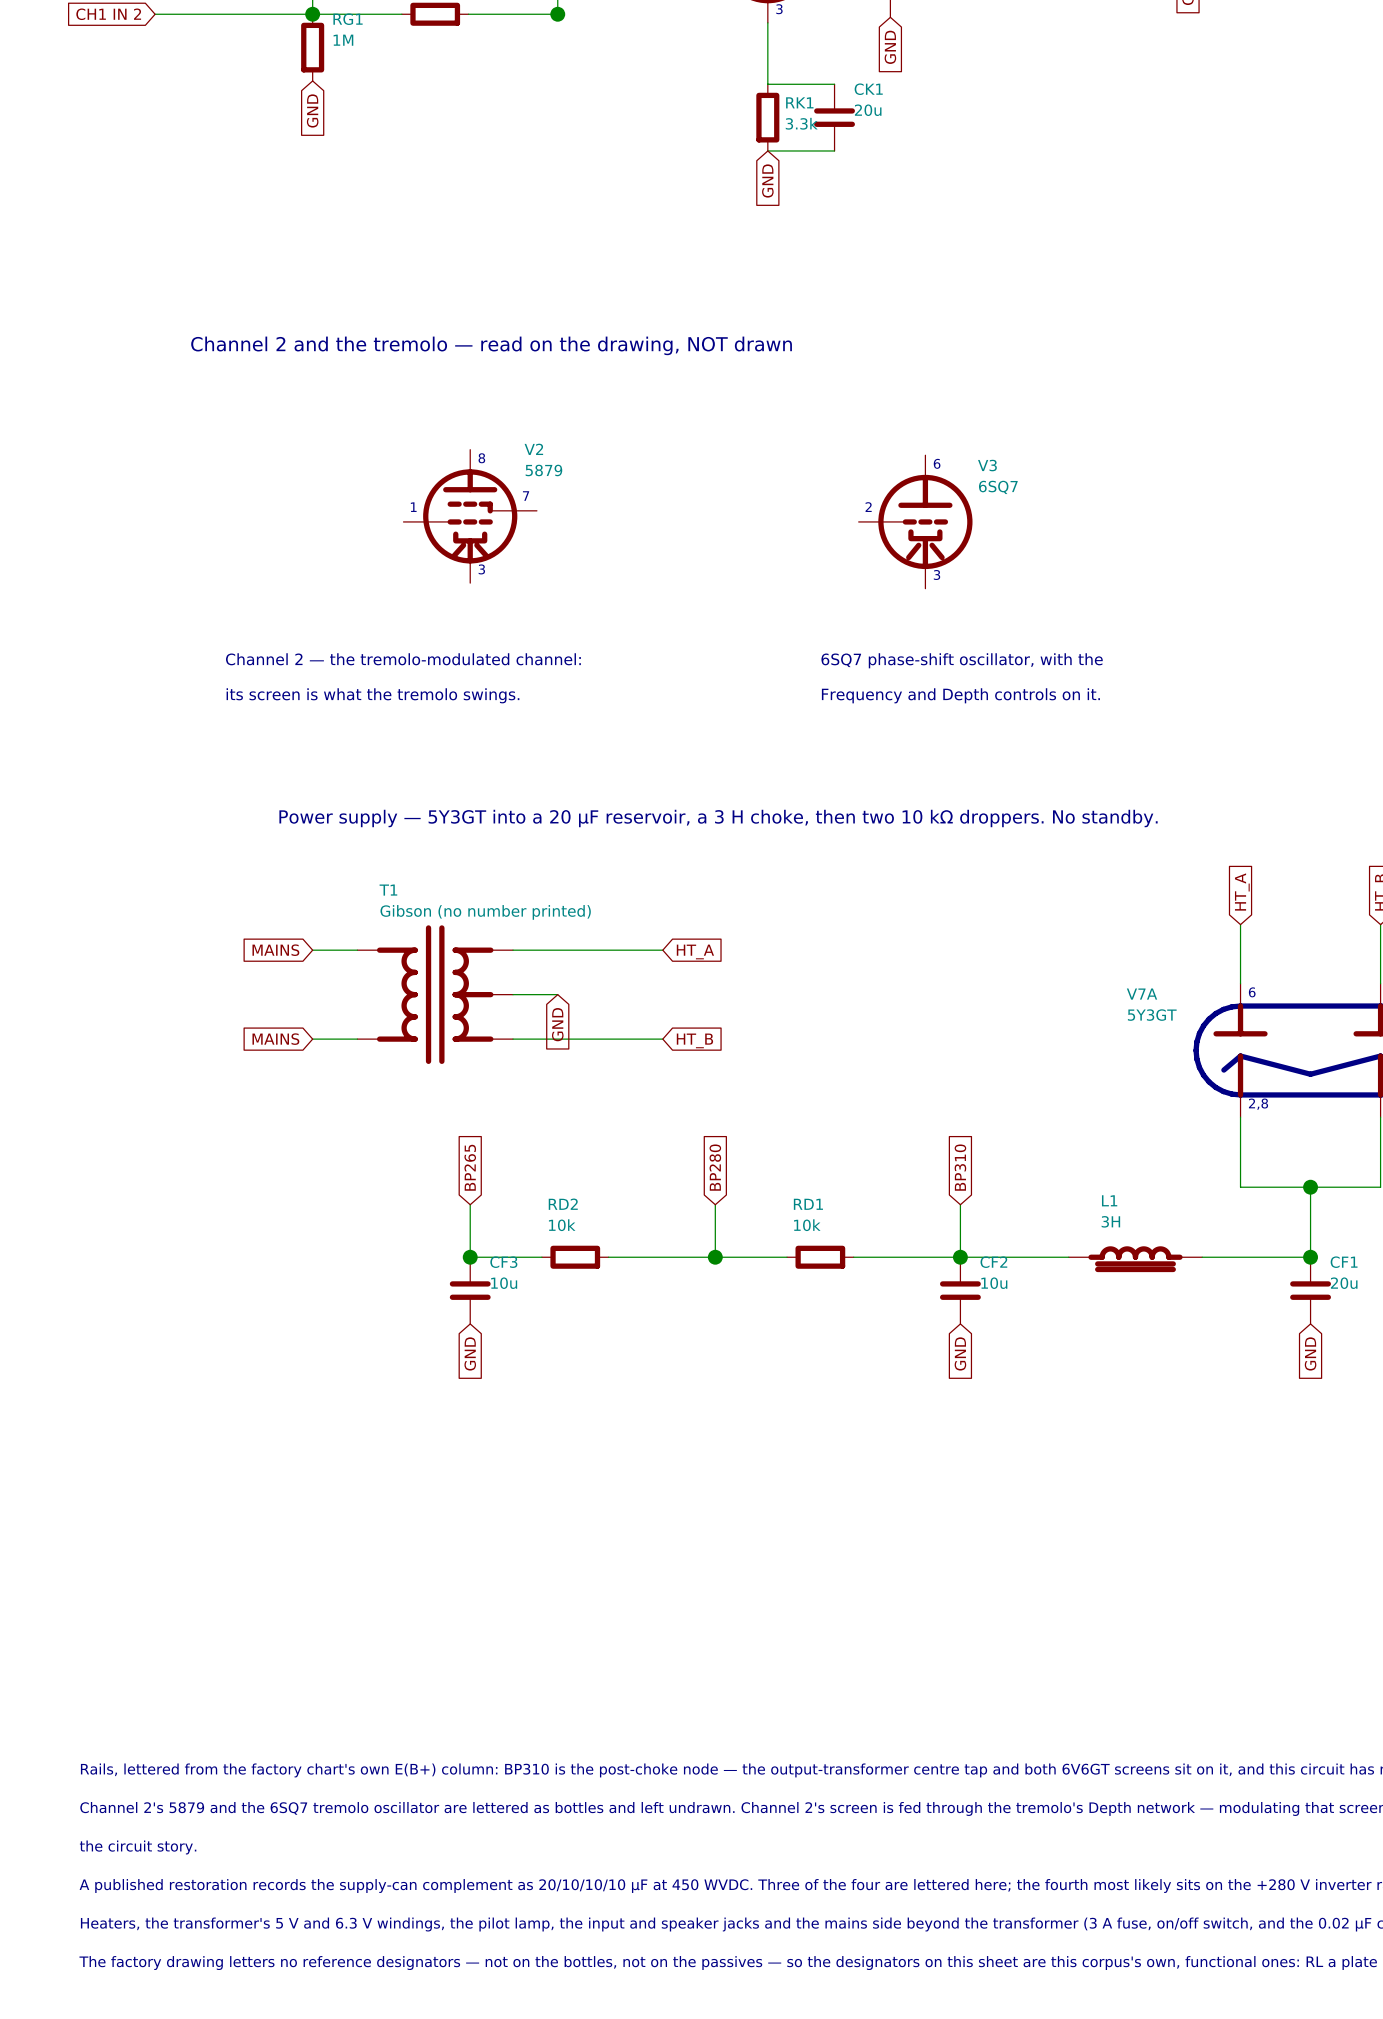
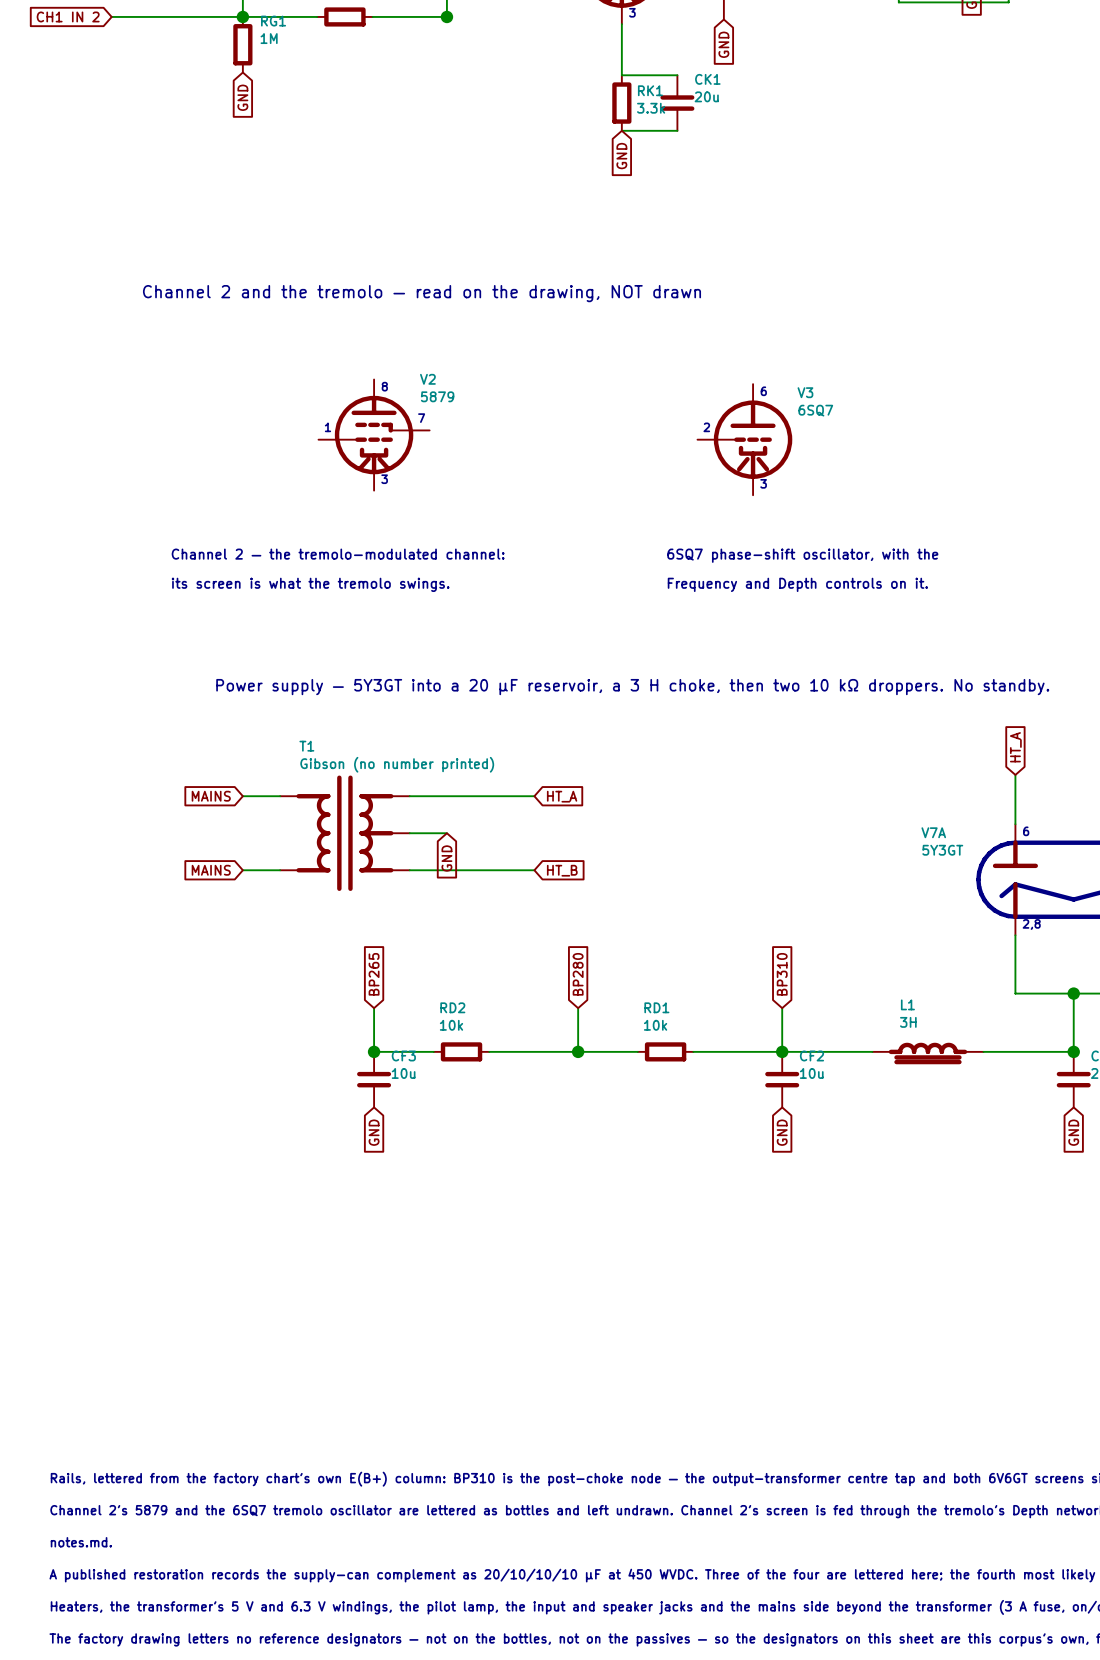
text: the circuit story. (138, 1847) -> notes.md. (81, 1542)

